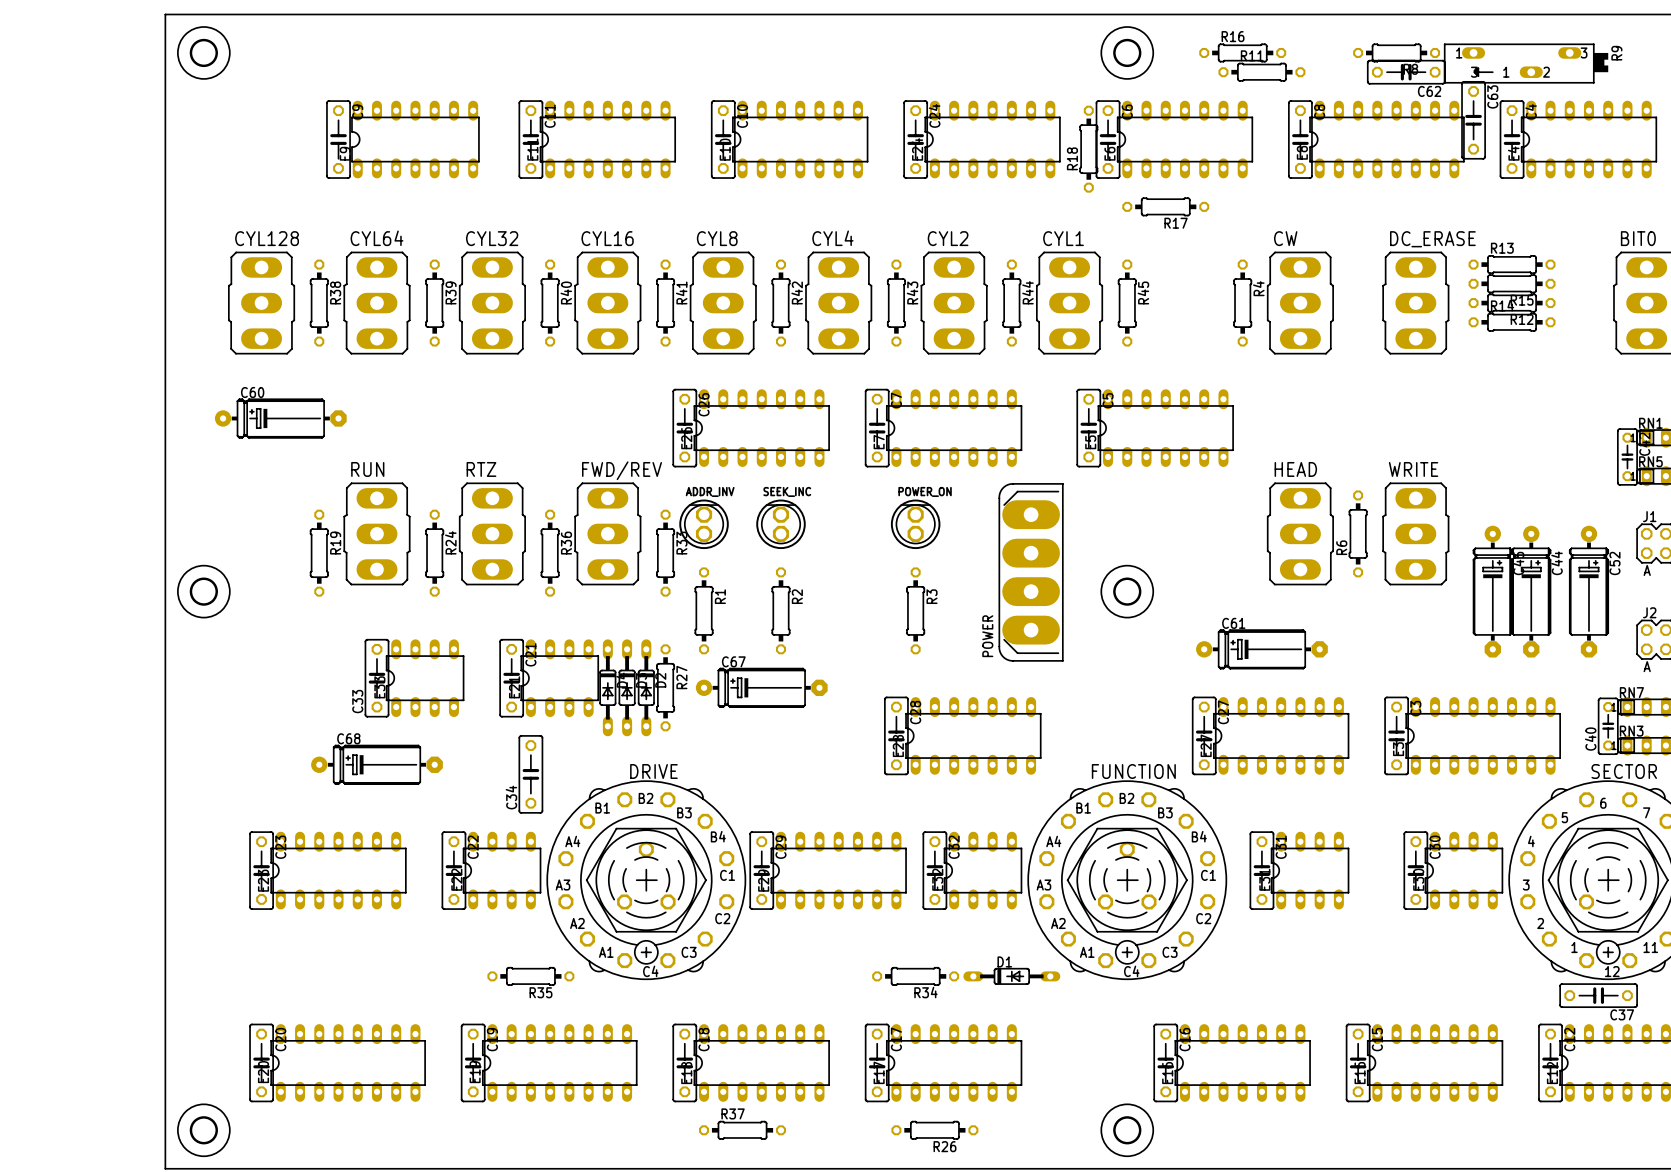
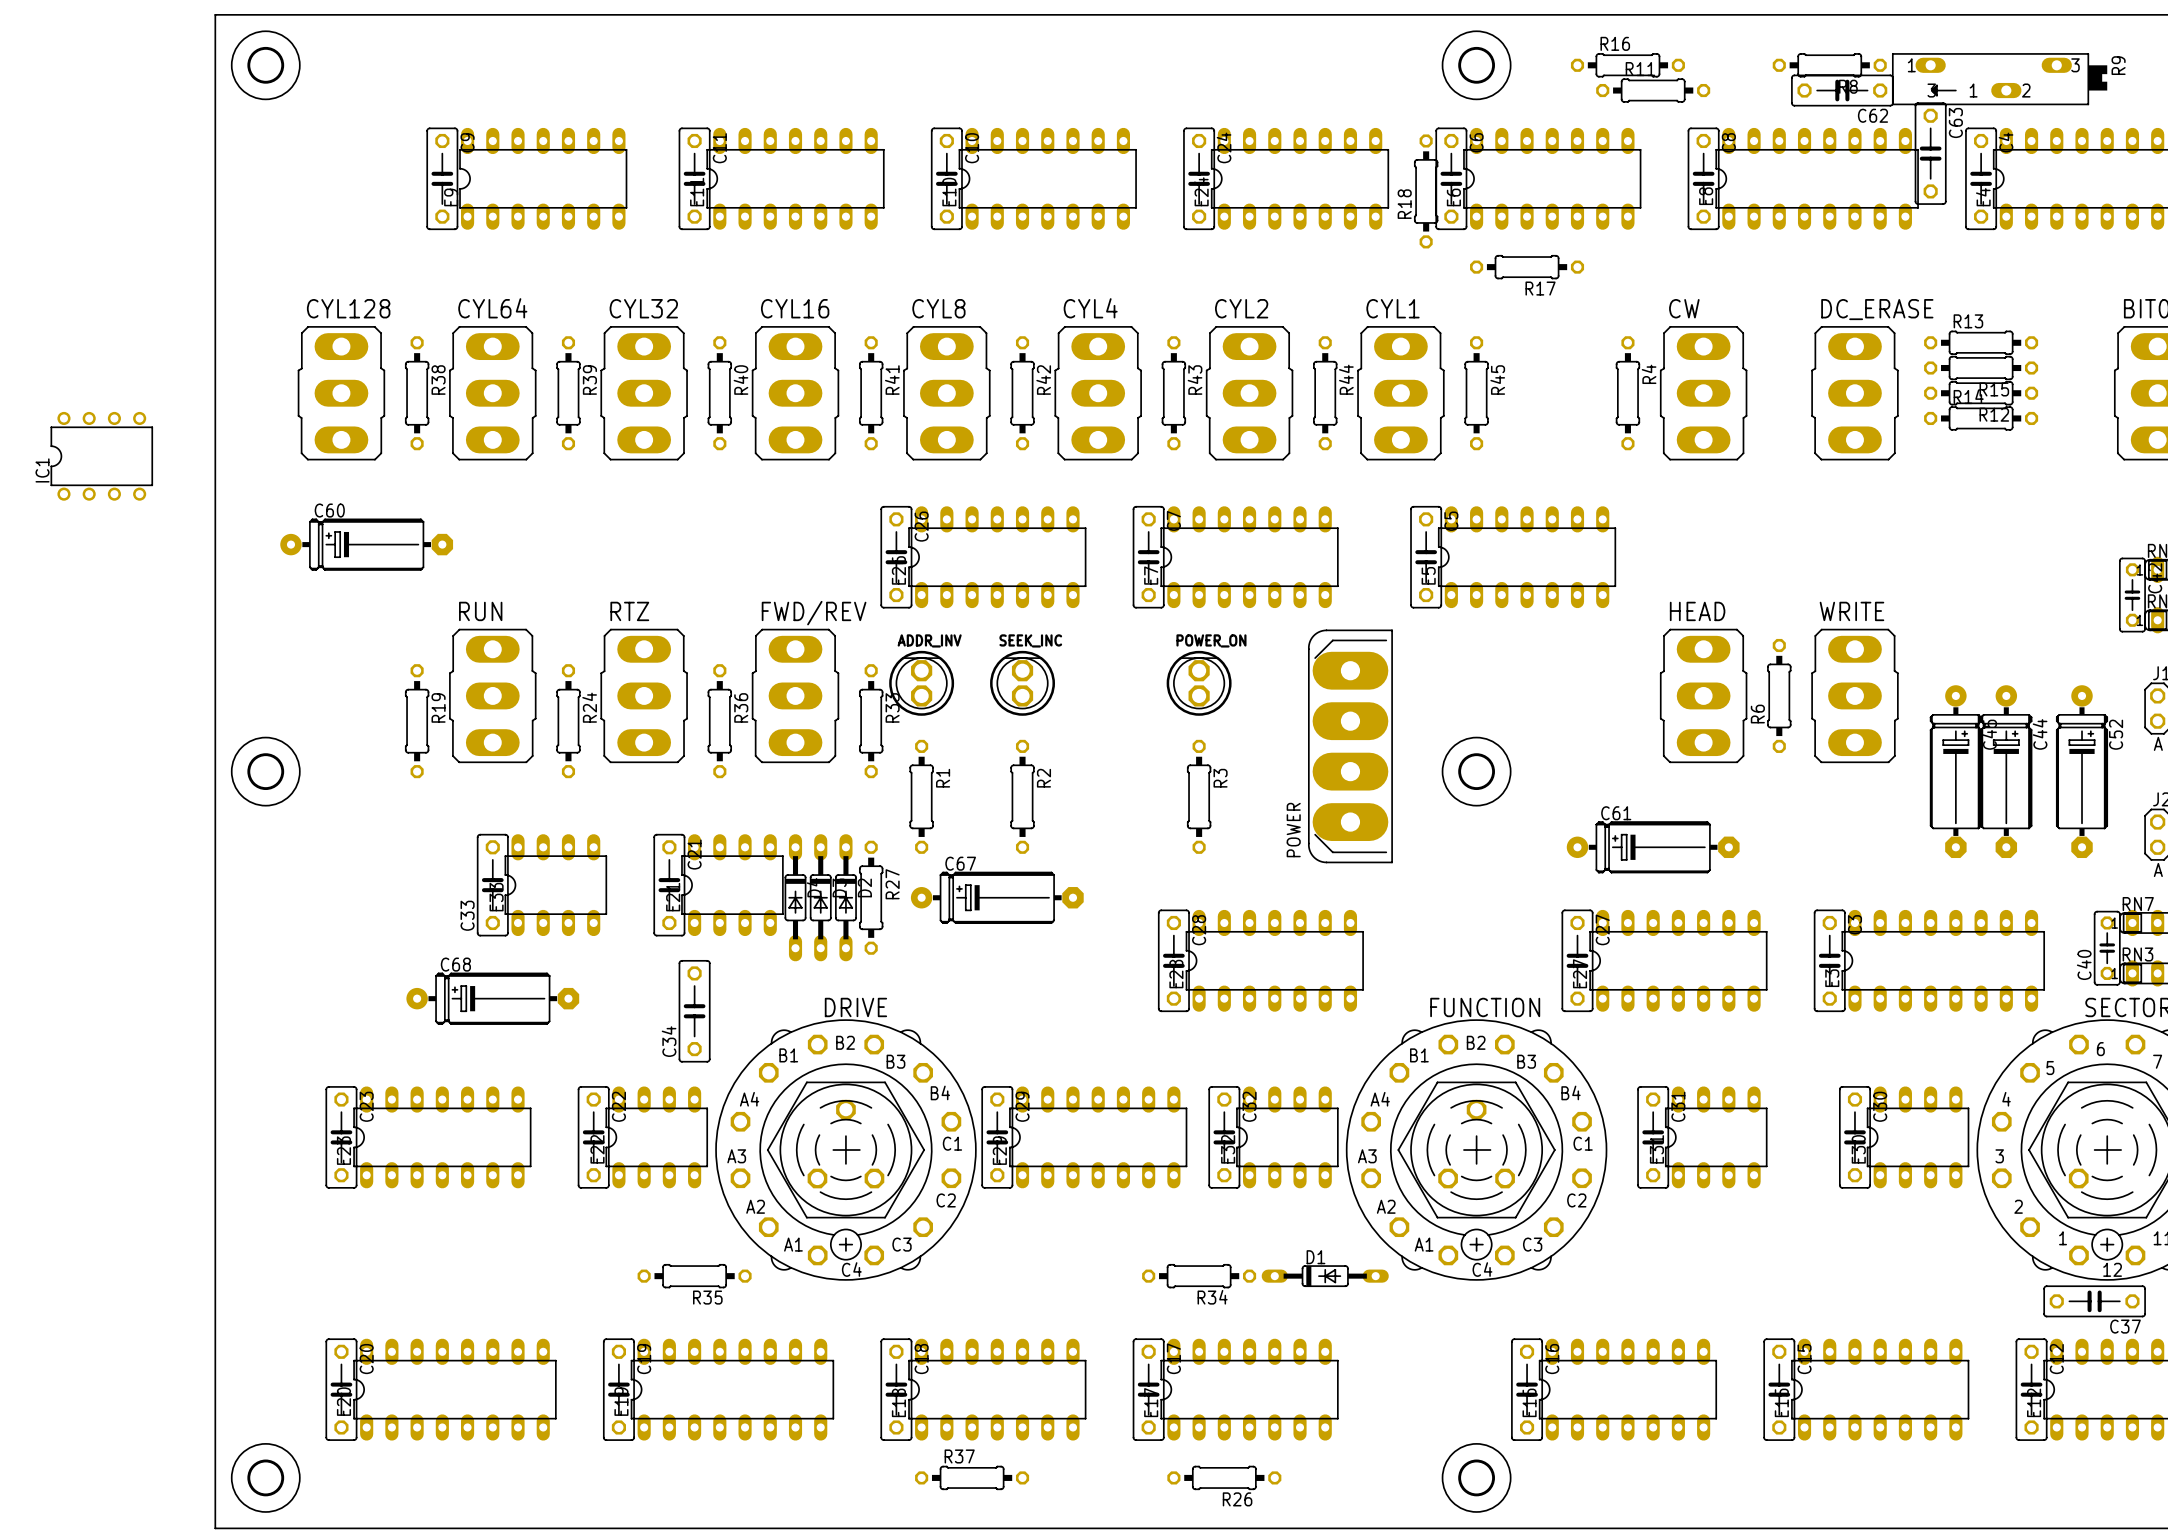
IC1: none -> (101, 456)

